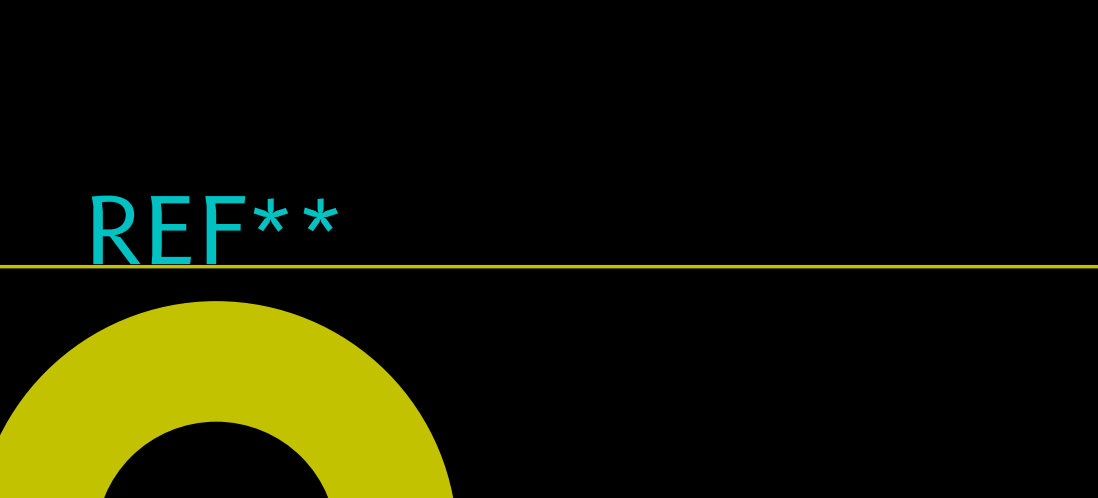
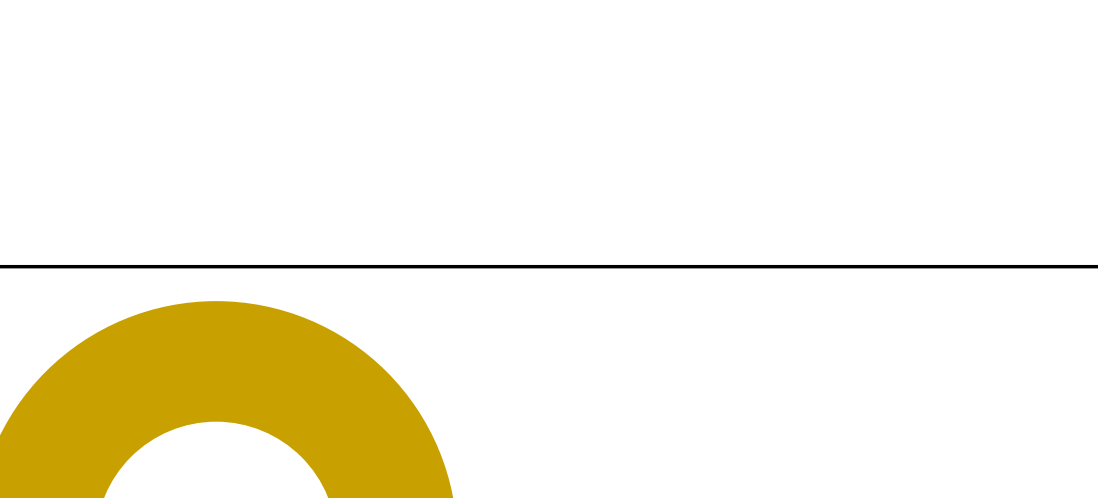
REF** name: REF** (214, 229) -> none

